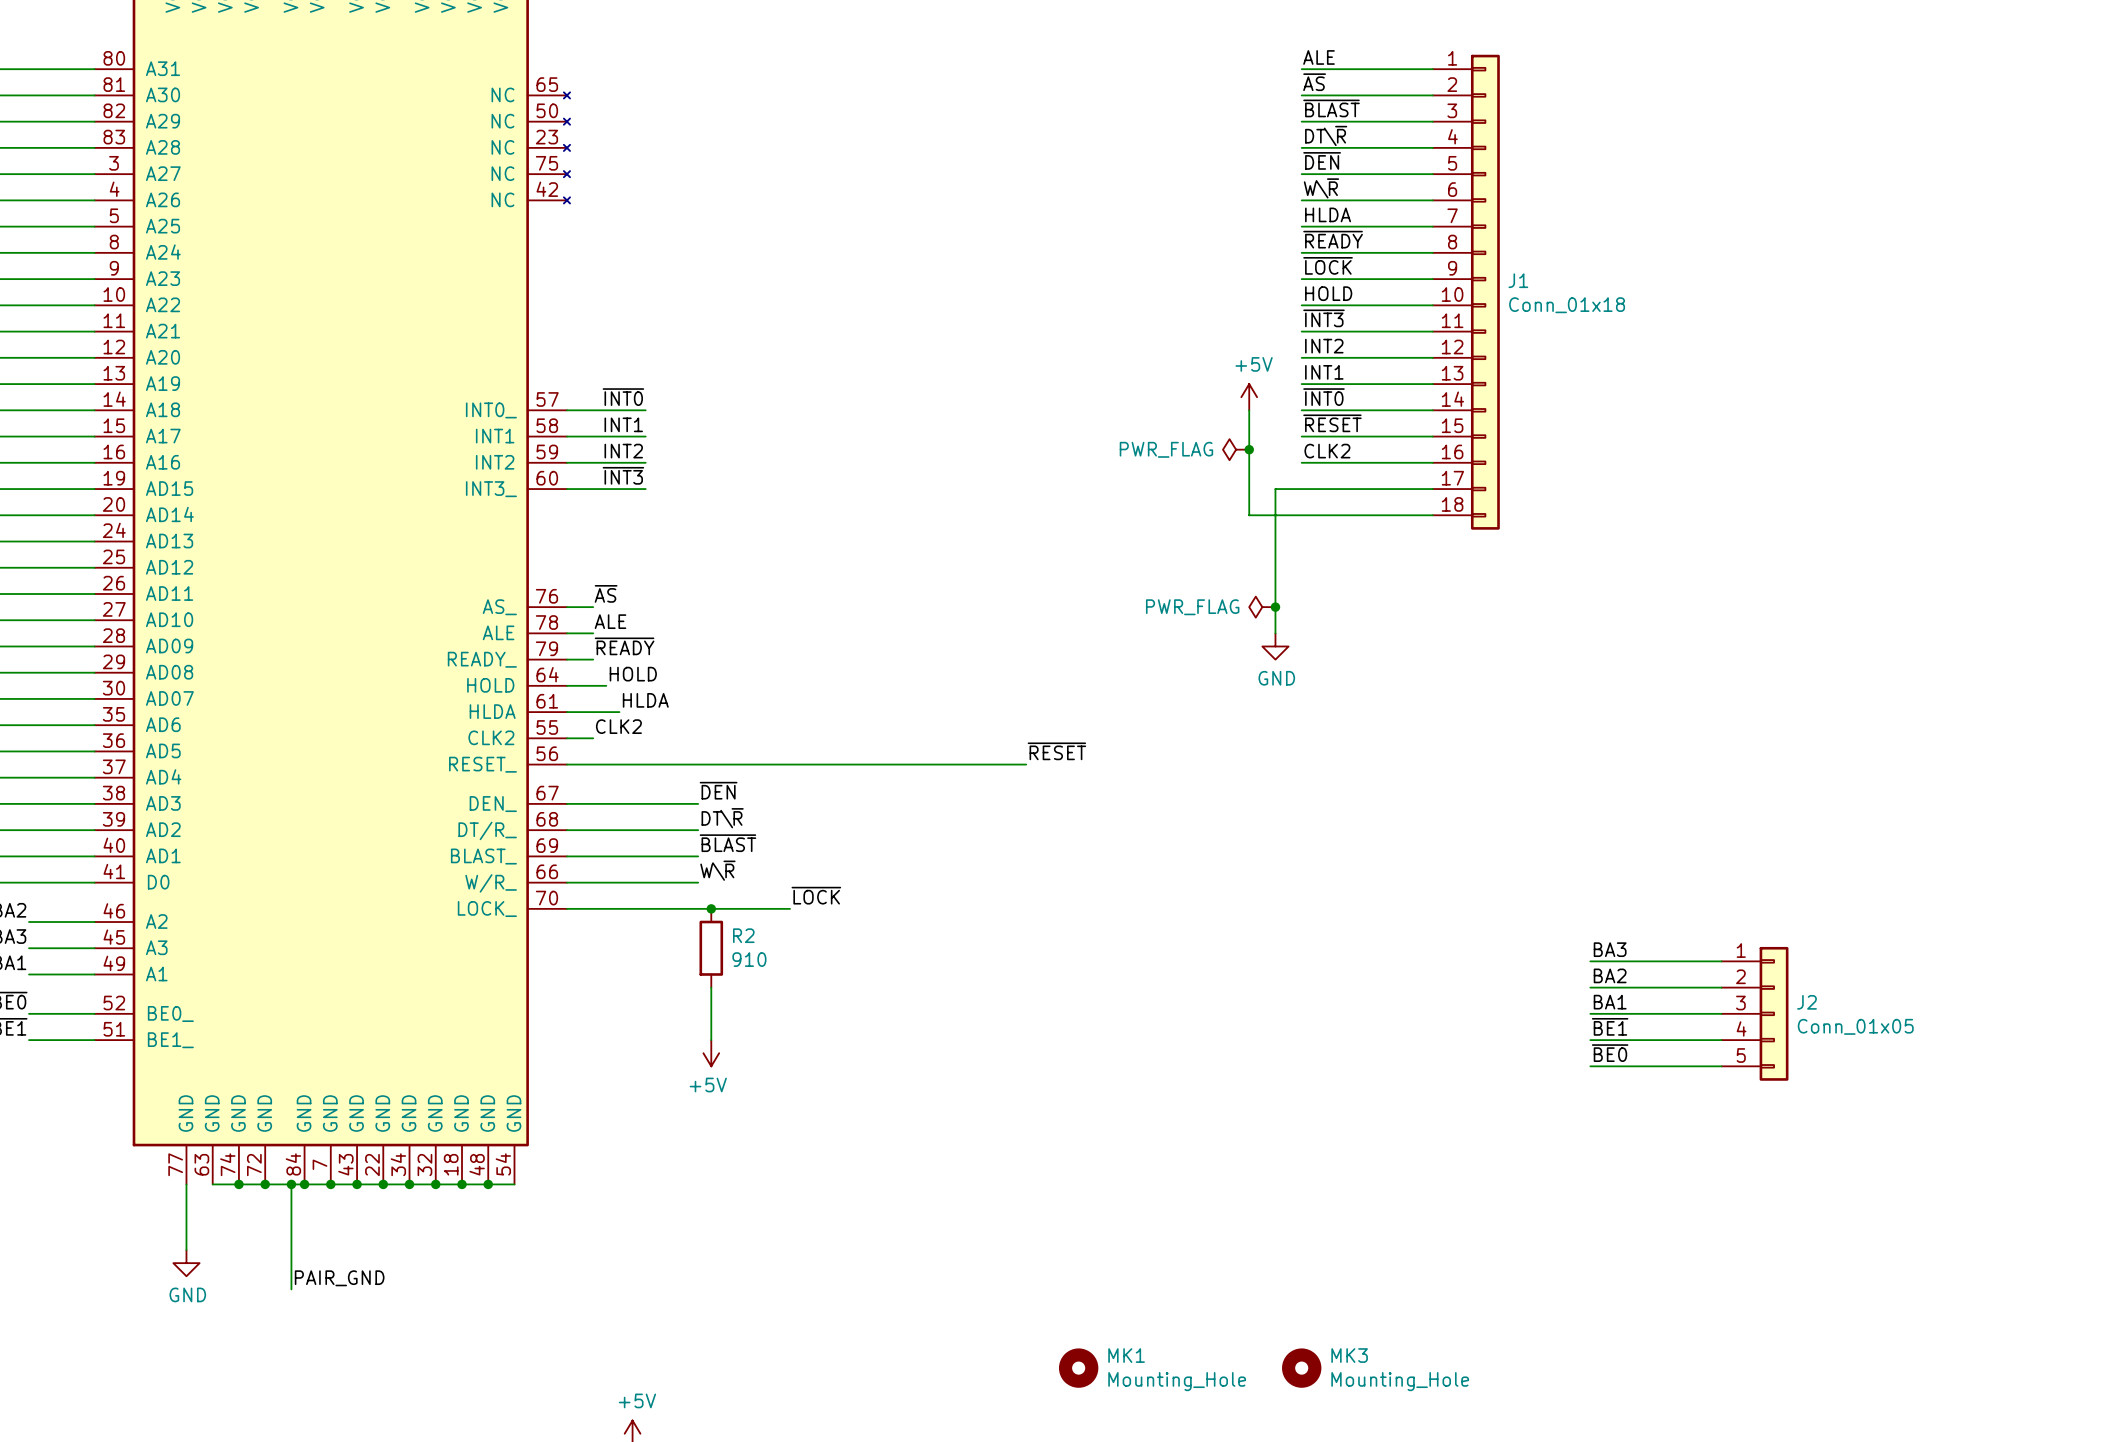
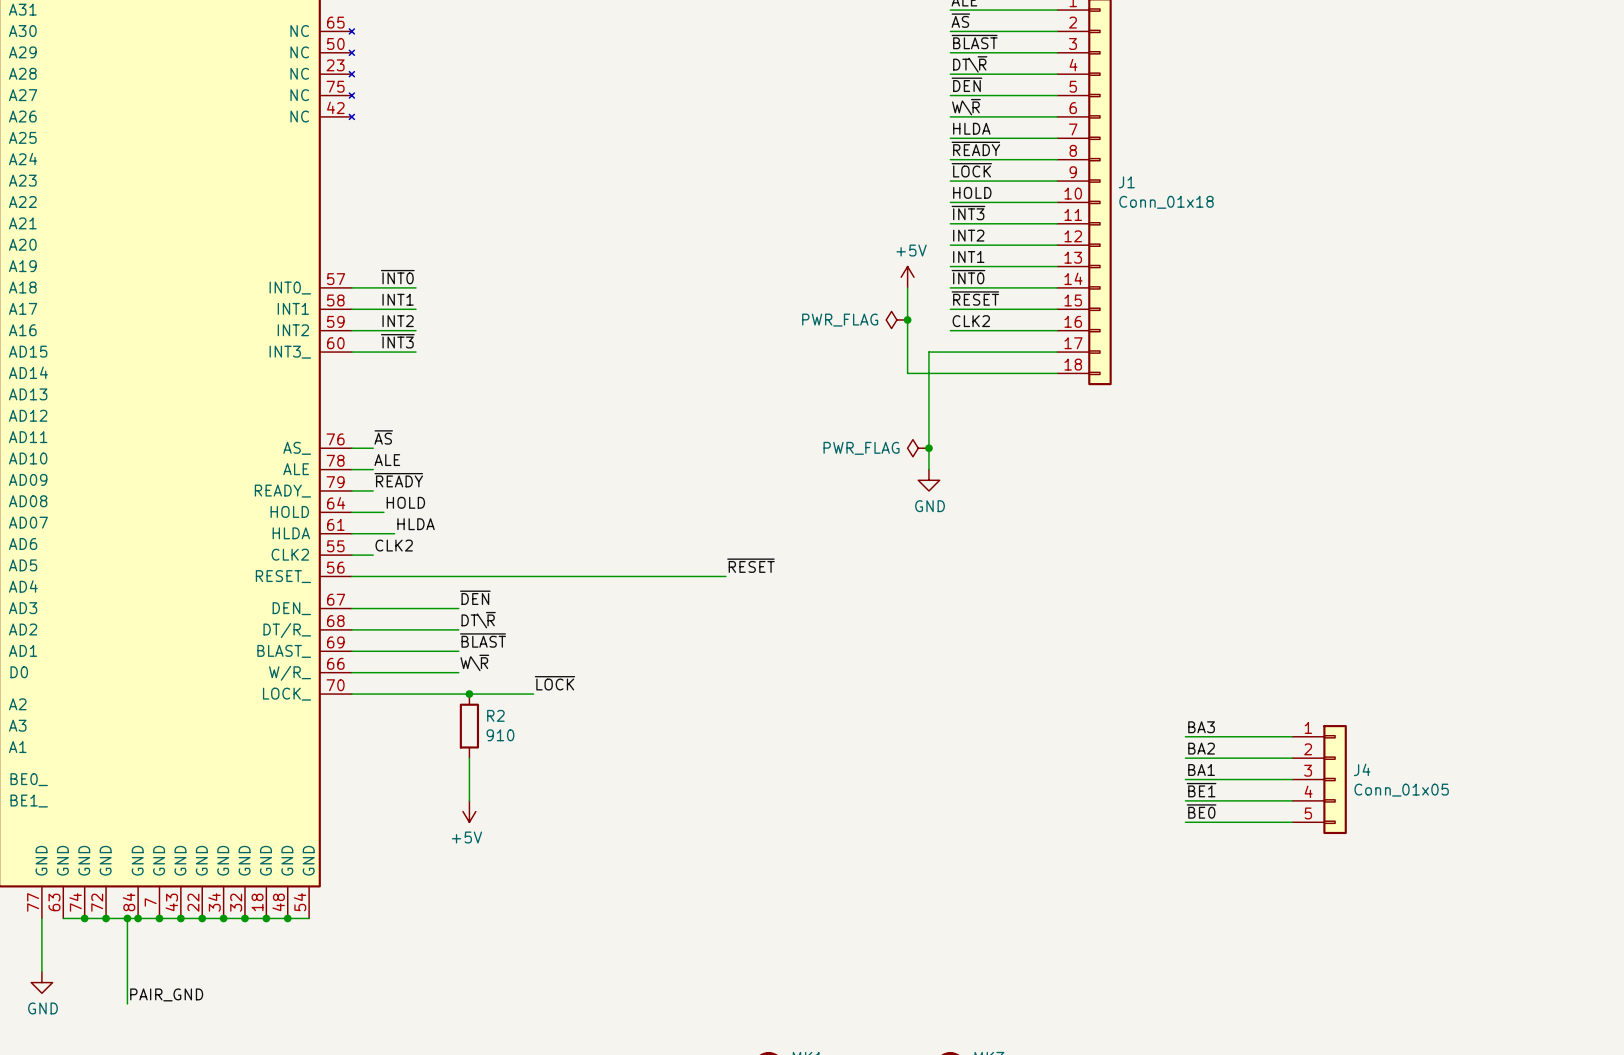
J2 name: J2 (1807, 1002) -> J4 (1362, 769)

